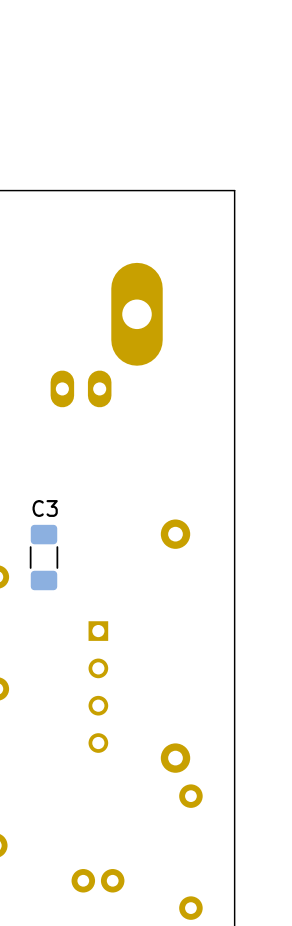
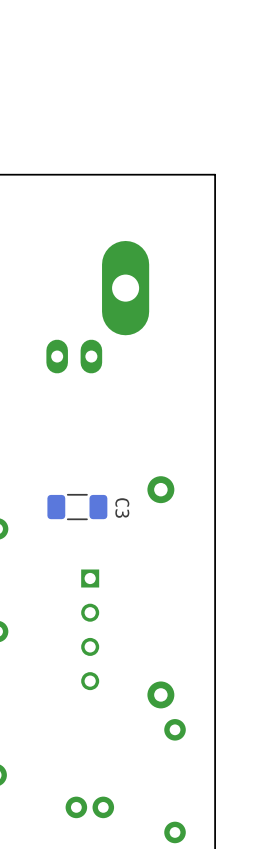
C3 rotation: 0° (44, 557) -> 90° clockwise (77, 507)
C3 position: (44, 557) -> (77, 507)

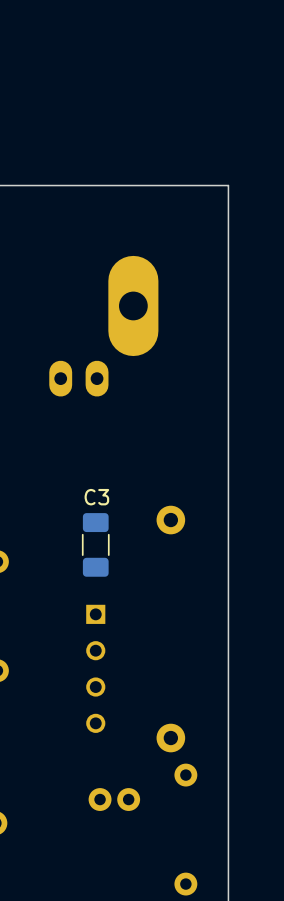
C3 rotation: 0° (77, 507) -> 90° clockwise (95, 544)
C3 name position: C3 (122, 508) -> C3 (96, 497)
part position: (89, 807) -> (114, 799)

